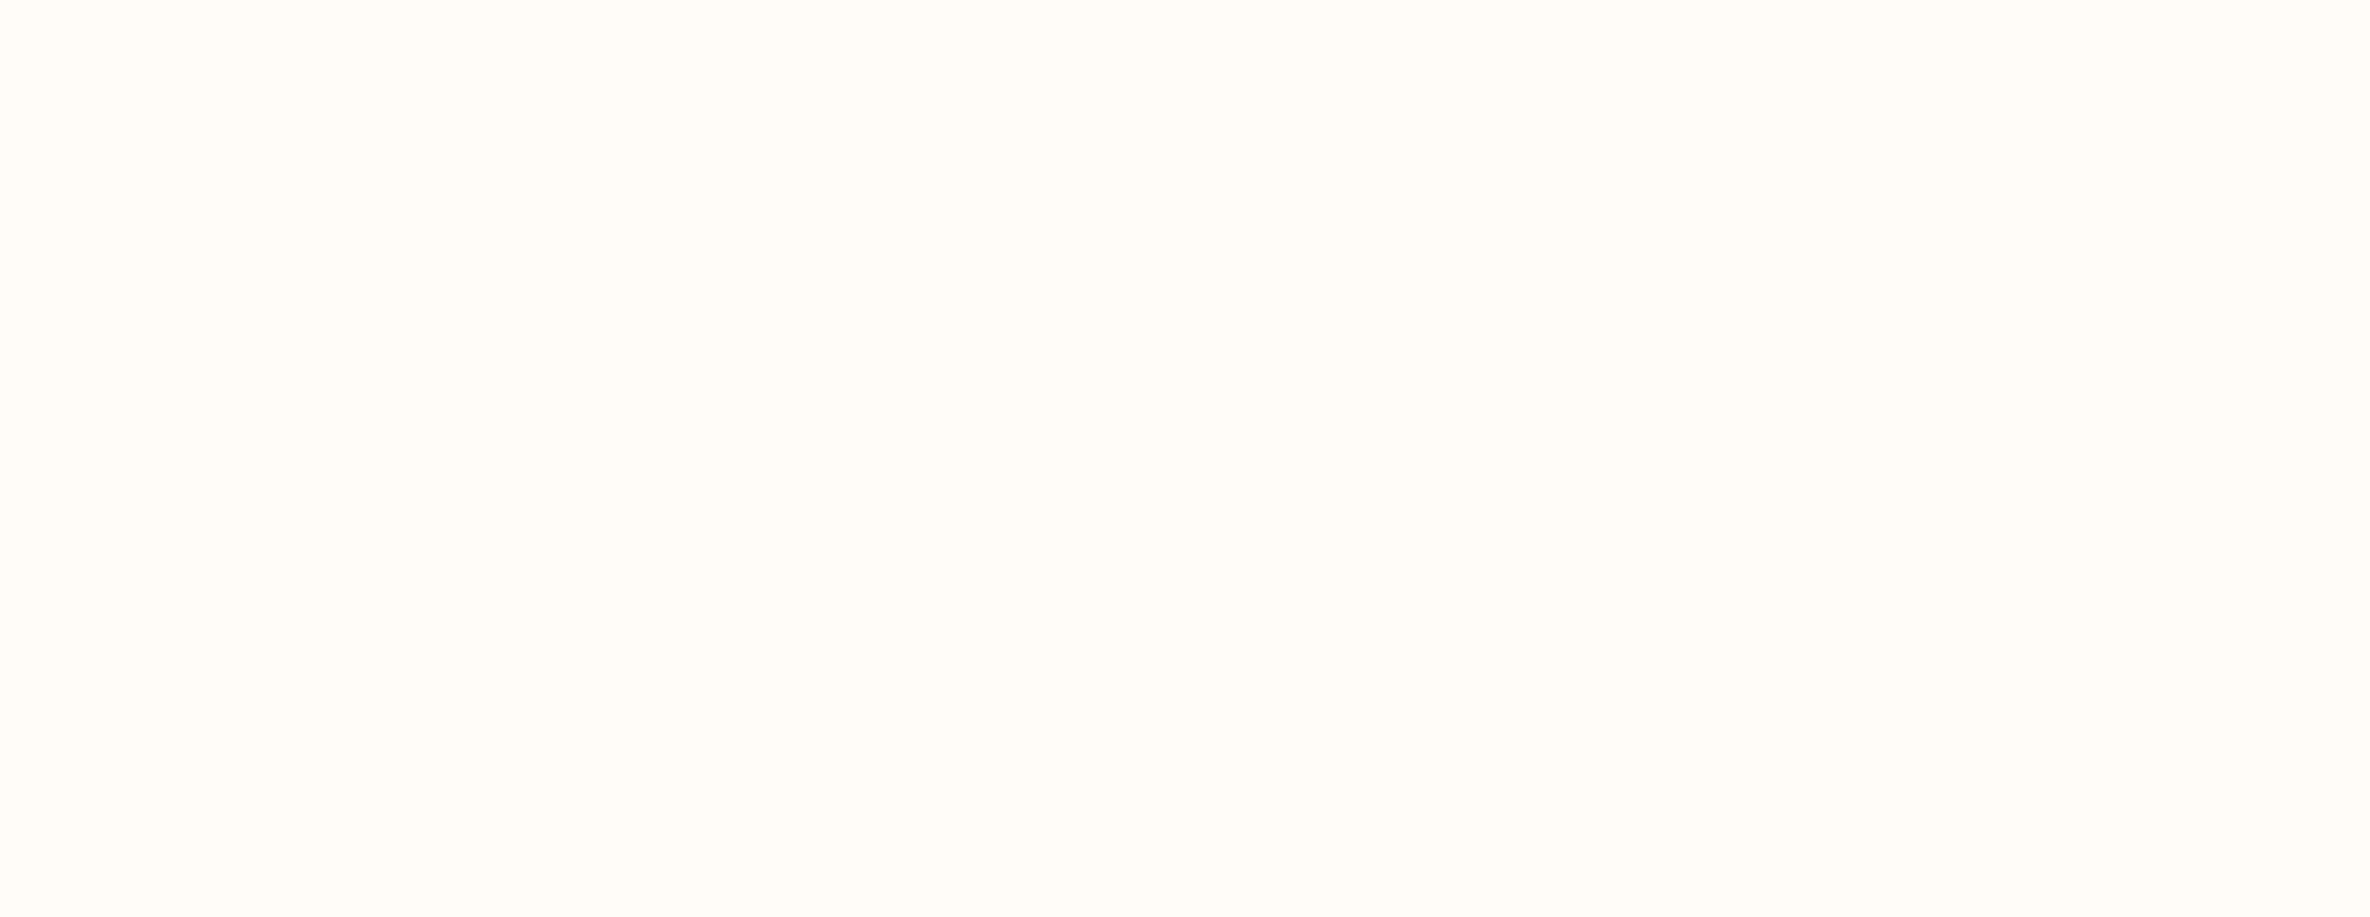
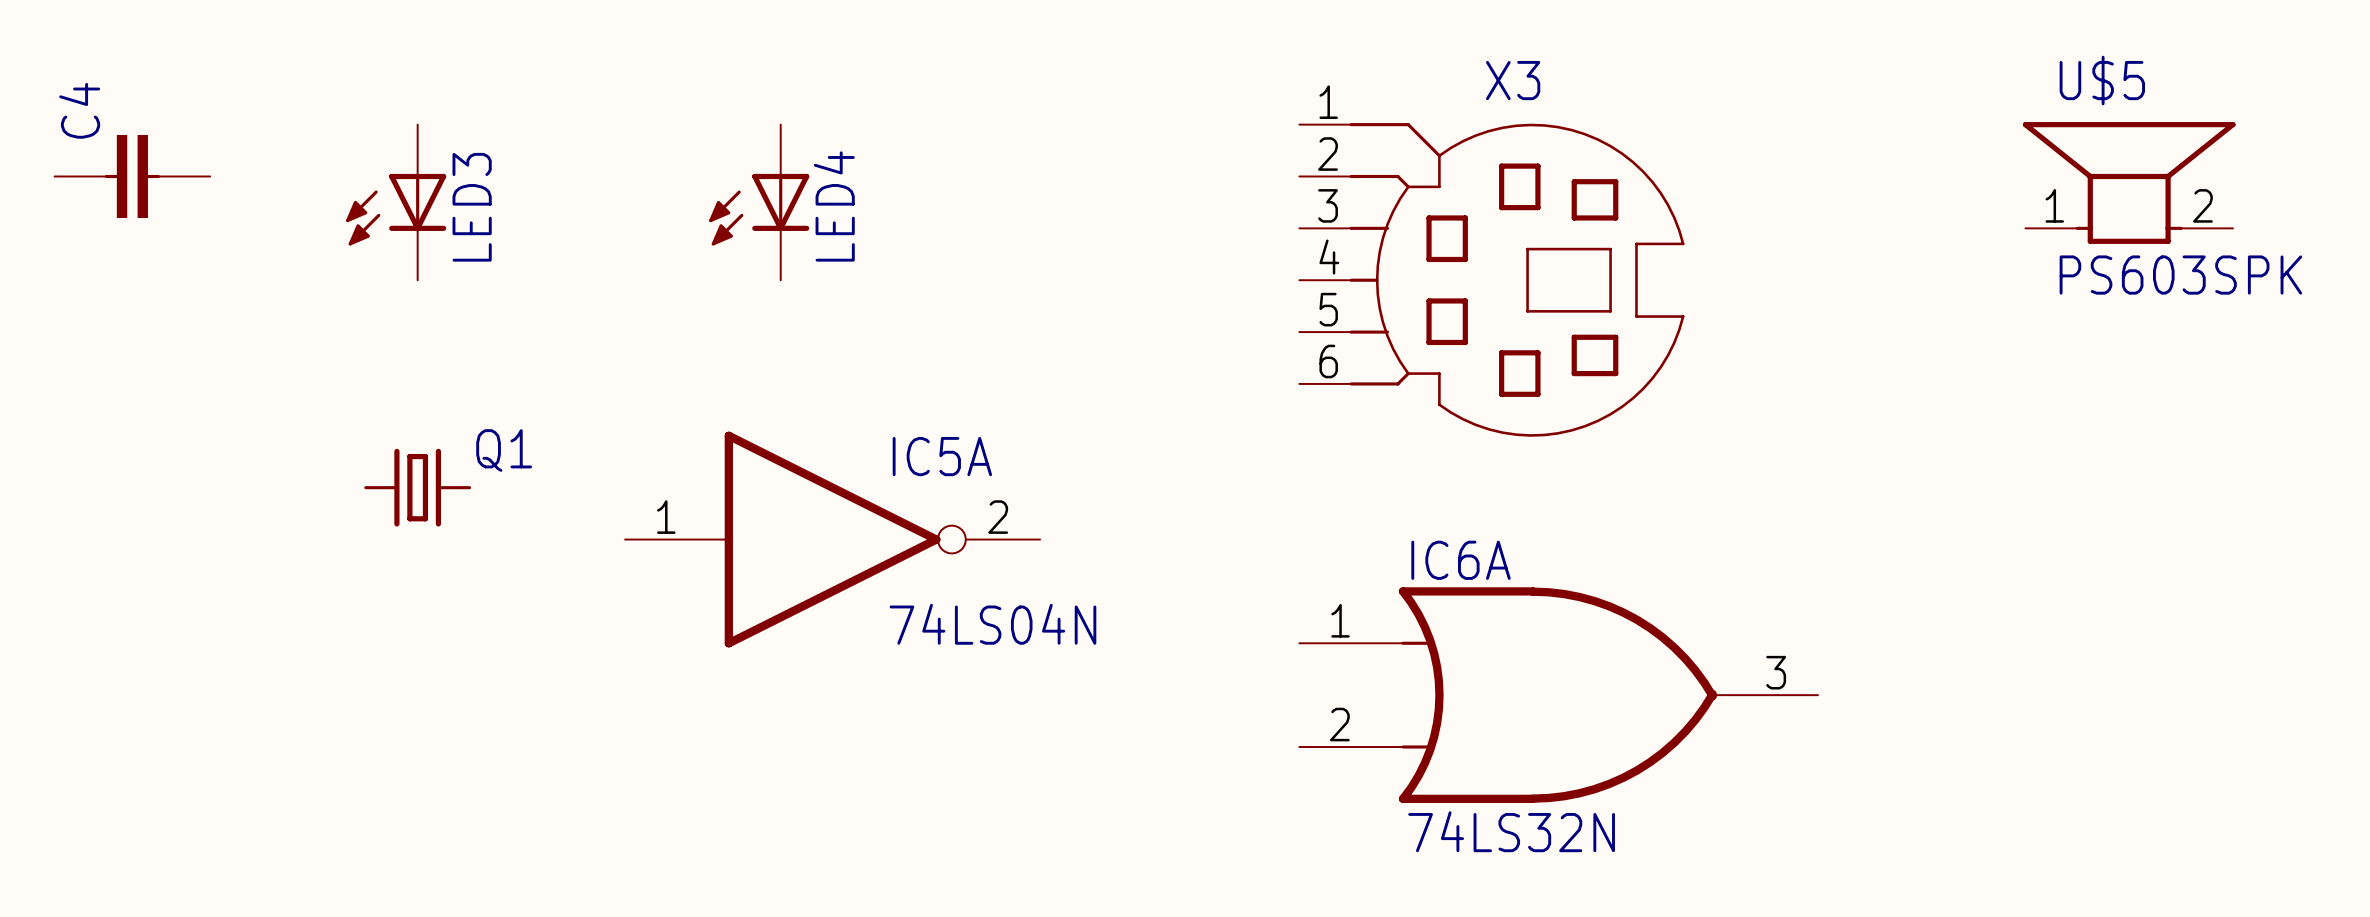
C4: none -> (132, 176)
U$5: none -> PS603SPK (2129, 182)
LED3: none -> (396, 202)
LED4: none -> (759, 202)
X3: none -> (1491, 279)
Q1: none -> (417, 487)
IC5A: none -> 74LS04N (832, 539)
IC6A: none -> 74LS32N (1558, 695)

